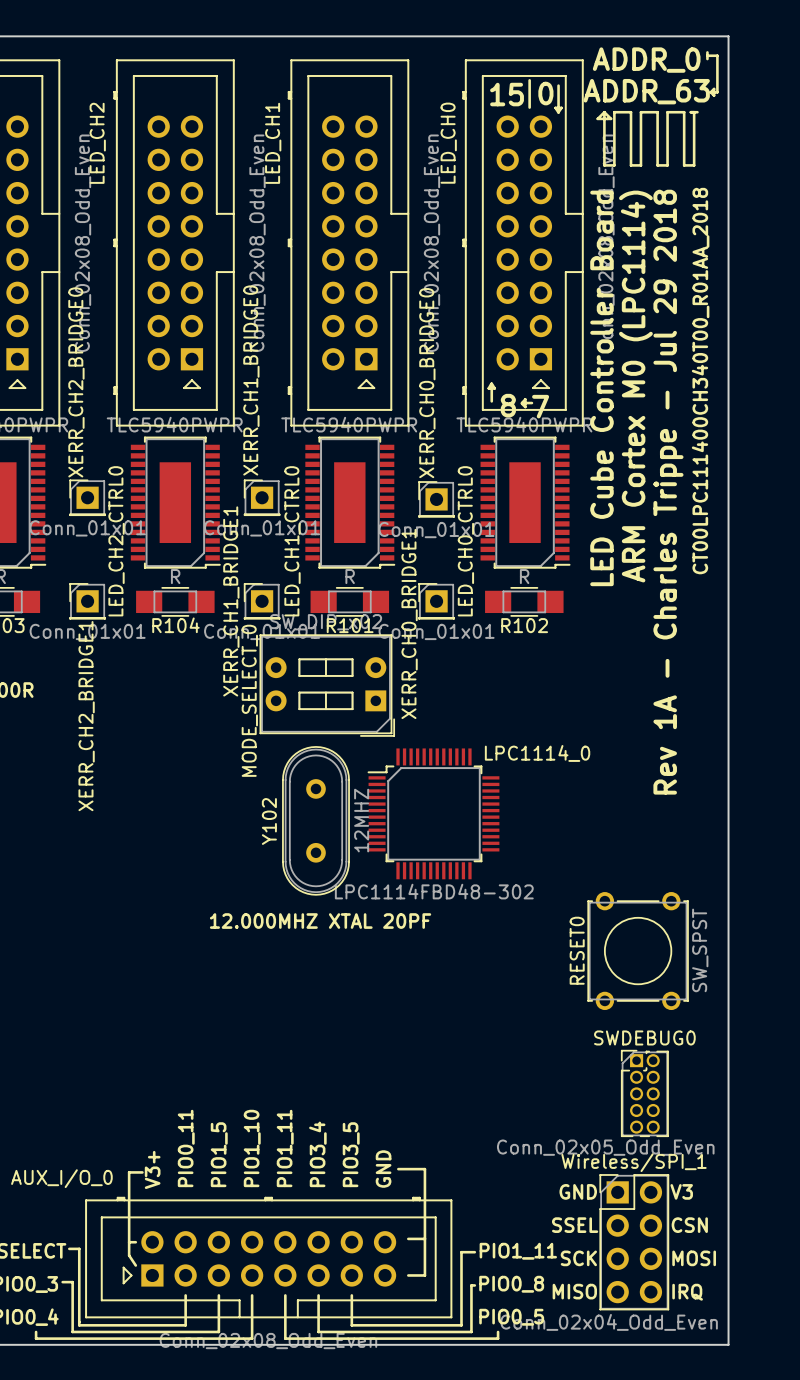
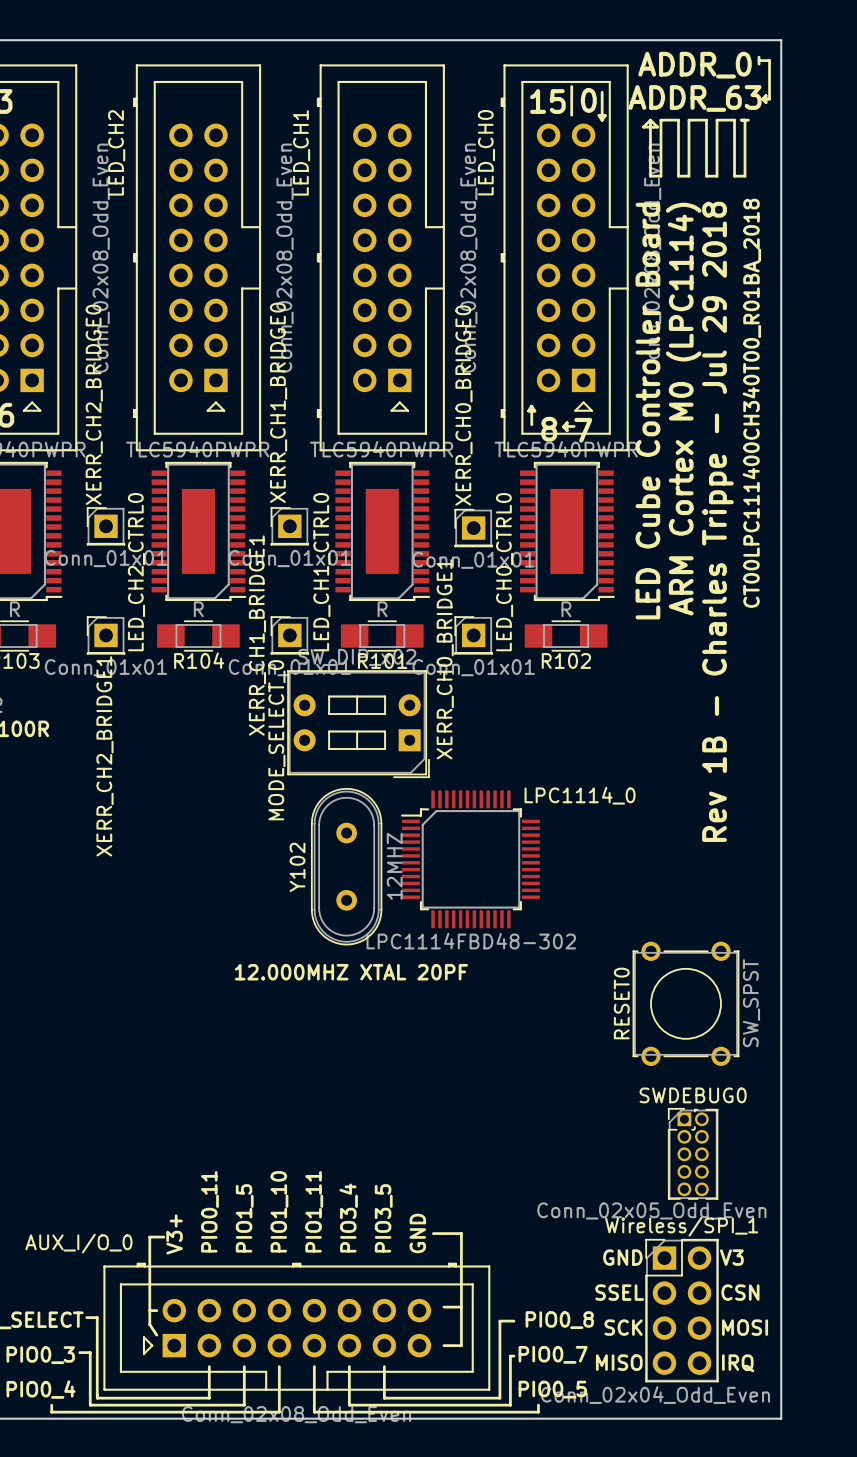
text: CT00LPC111400CH340T00_R01AA_2018 (700, 381) -> CT00LPC111400CH340T00_R01BA_2018 (751, 403)
text: Rev 1A - Charles Trippe - Jul 29 2018 (668, 492) -> Rev 1B - Charles Trippe - Jul 29 2018 (717, 521)
text: PIO1_11 (518, 1251) -> PIO0_8 (559, 1320)
text: PIO0_8 (511, 1284) -> PIO0_7 (553, 1354)

